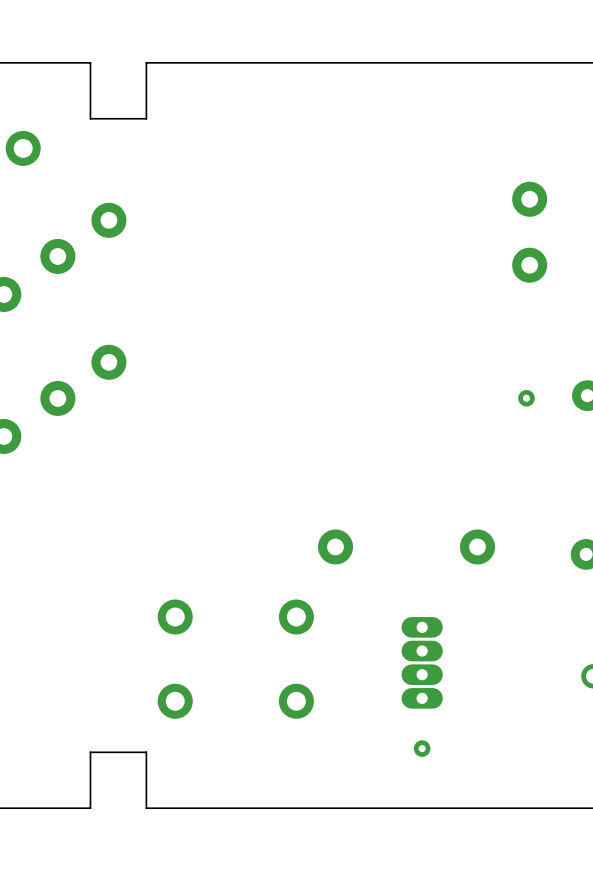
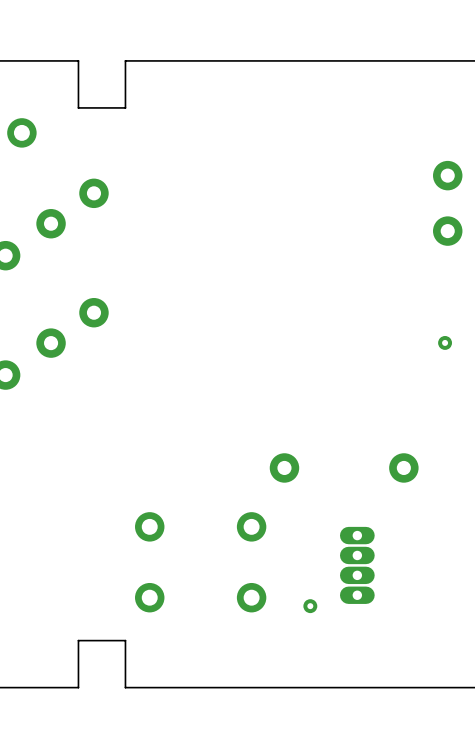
part position: (422, 748) -> (310, 606)

